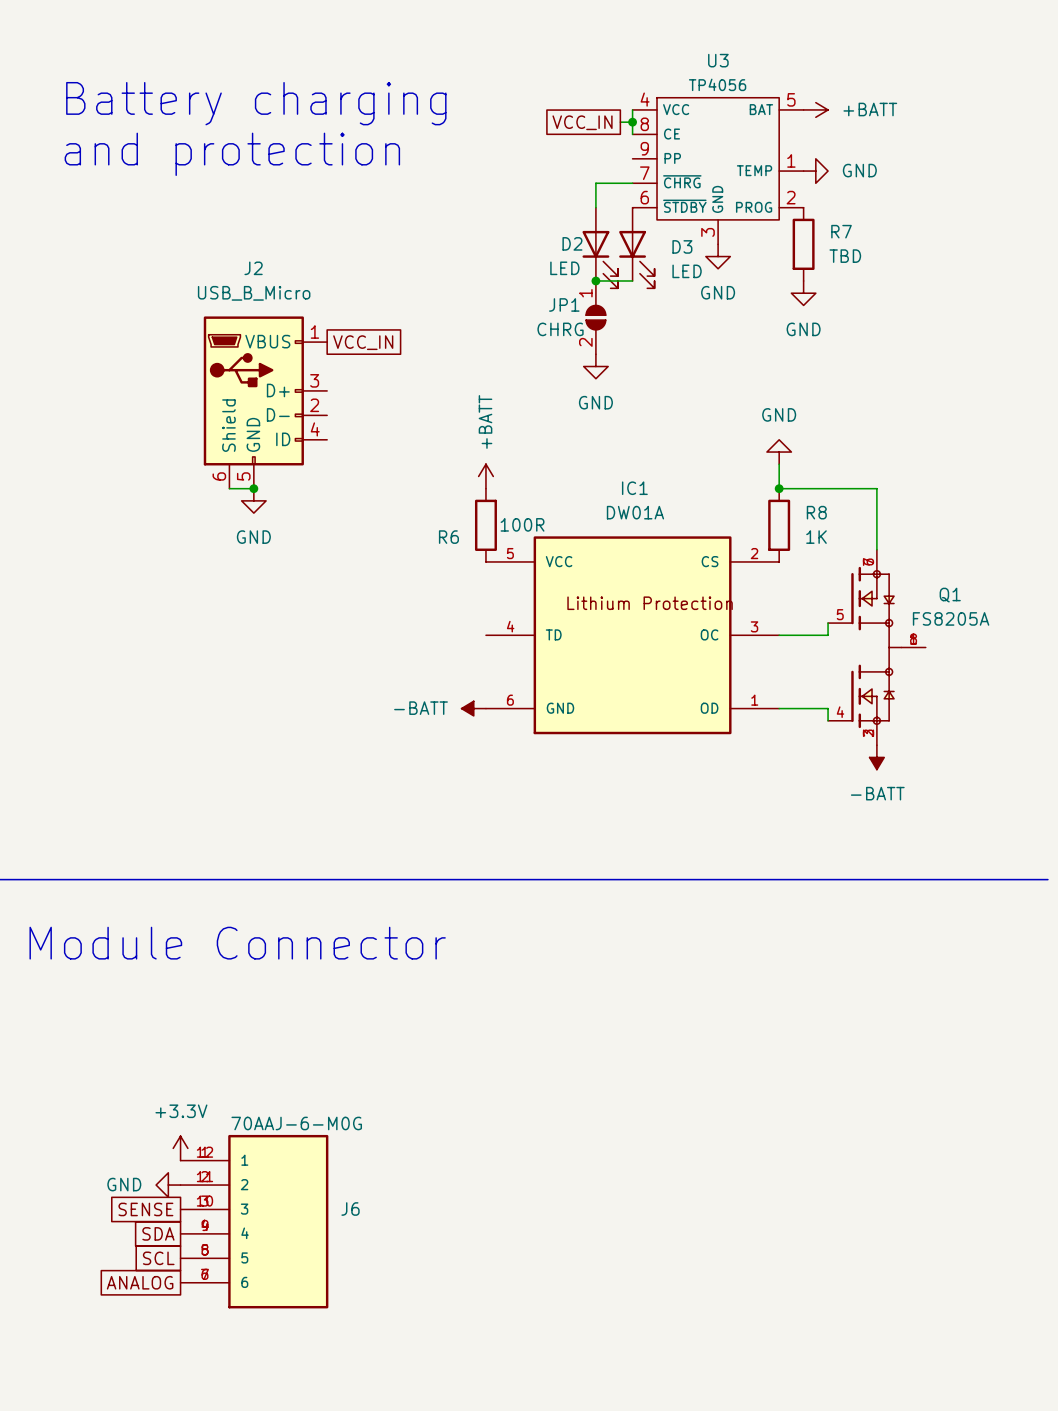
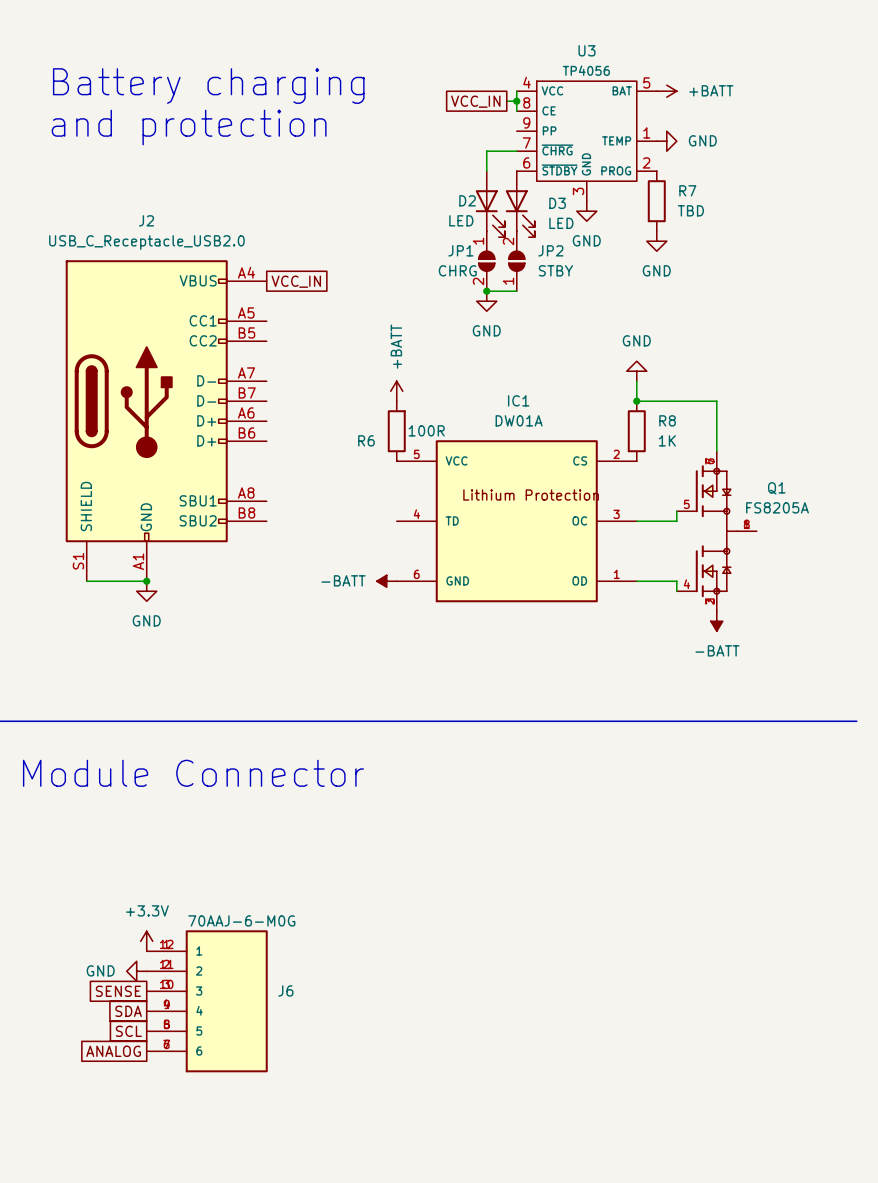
J2 name position: J2 (253, 268) -> J2 (146, 220)
wire: (595, 280) (632, 280) -> (486, 291) (516, 291)
junction: (595, 280) -> none
J2 value: USB_B_Micro (254, 293) -> USB_C_Receptacle_USB2.0 (146, 242)
J2 symbol: [203, 316, 328, 489] -> [65, 260, 267, 582]
JP2: none -> STBY (516, 261)
junction: none -> (486, 291)
junction: (253, 488) -> none
power symbol position: GND (253, 500) -> GND (146, 591)
wire: none -> (86, 581) (146, 581)
junction: none -> (146, 581)

